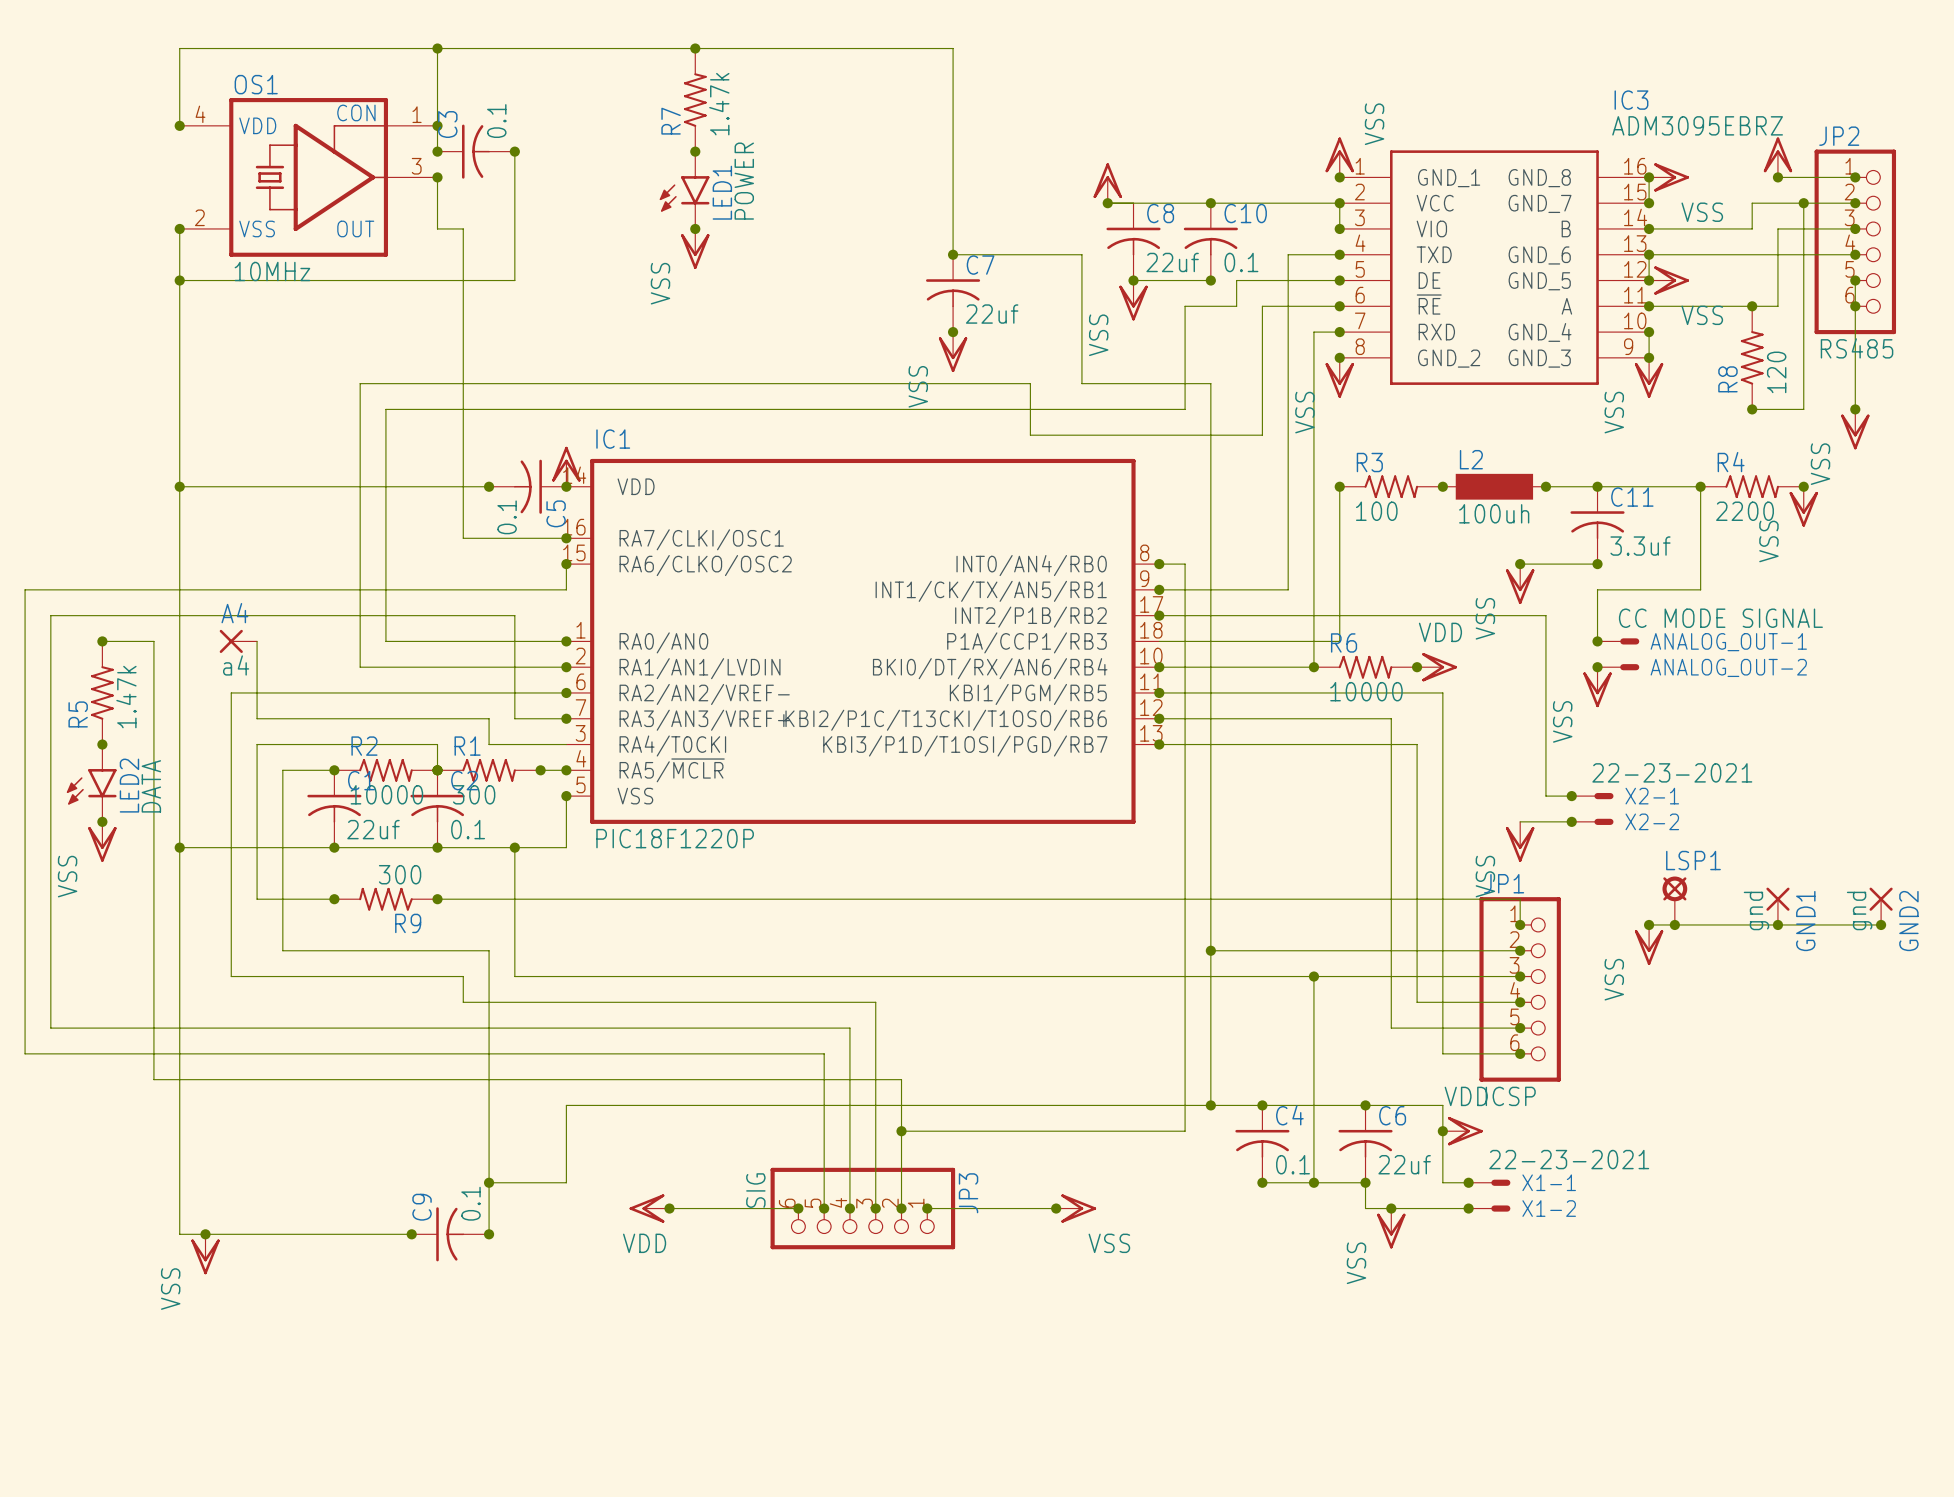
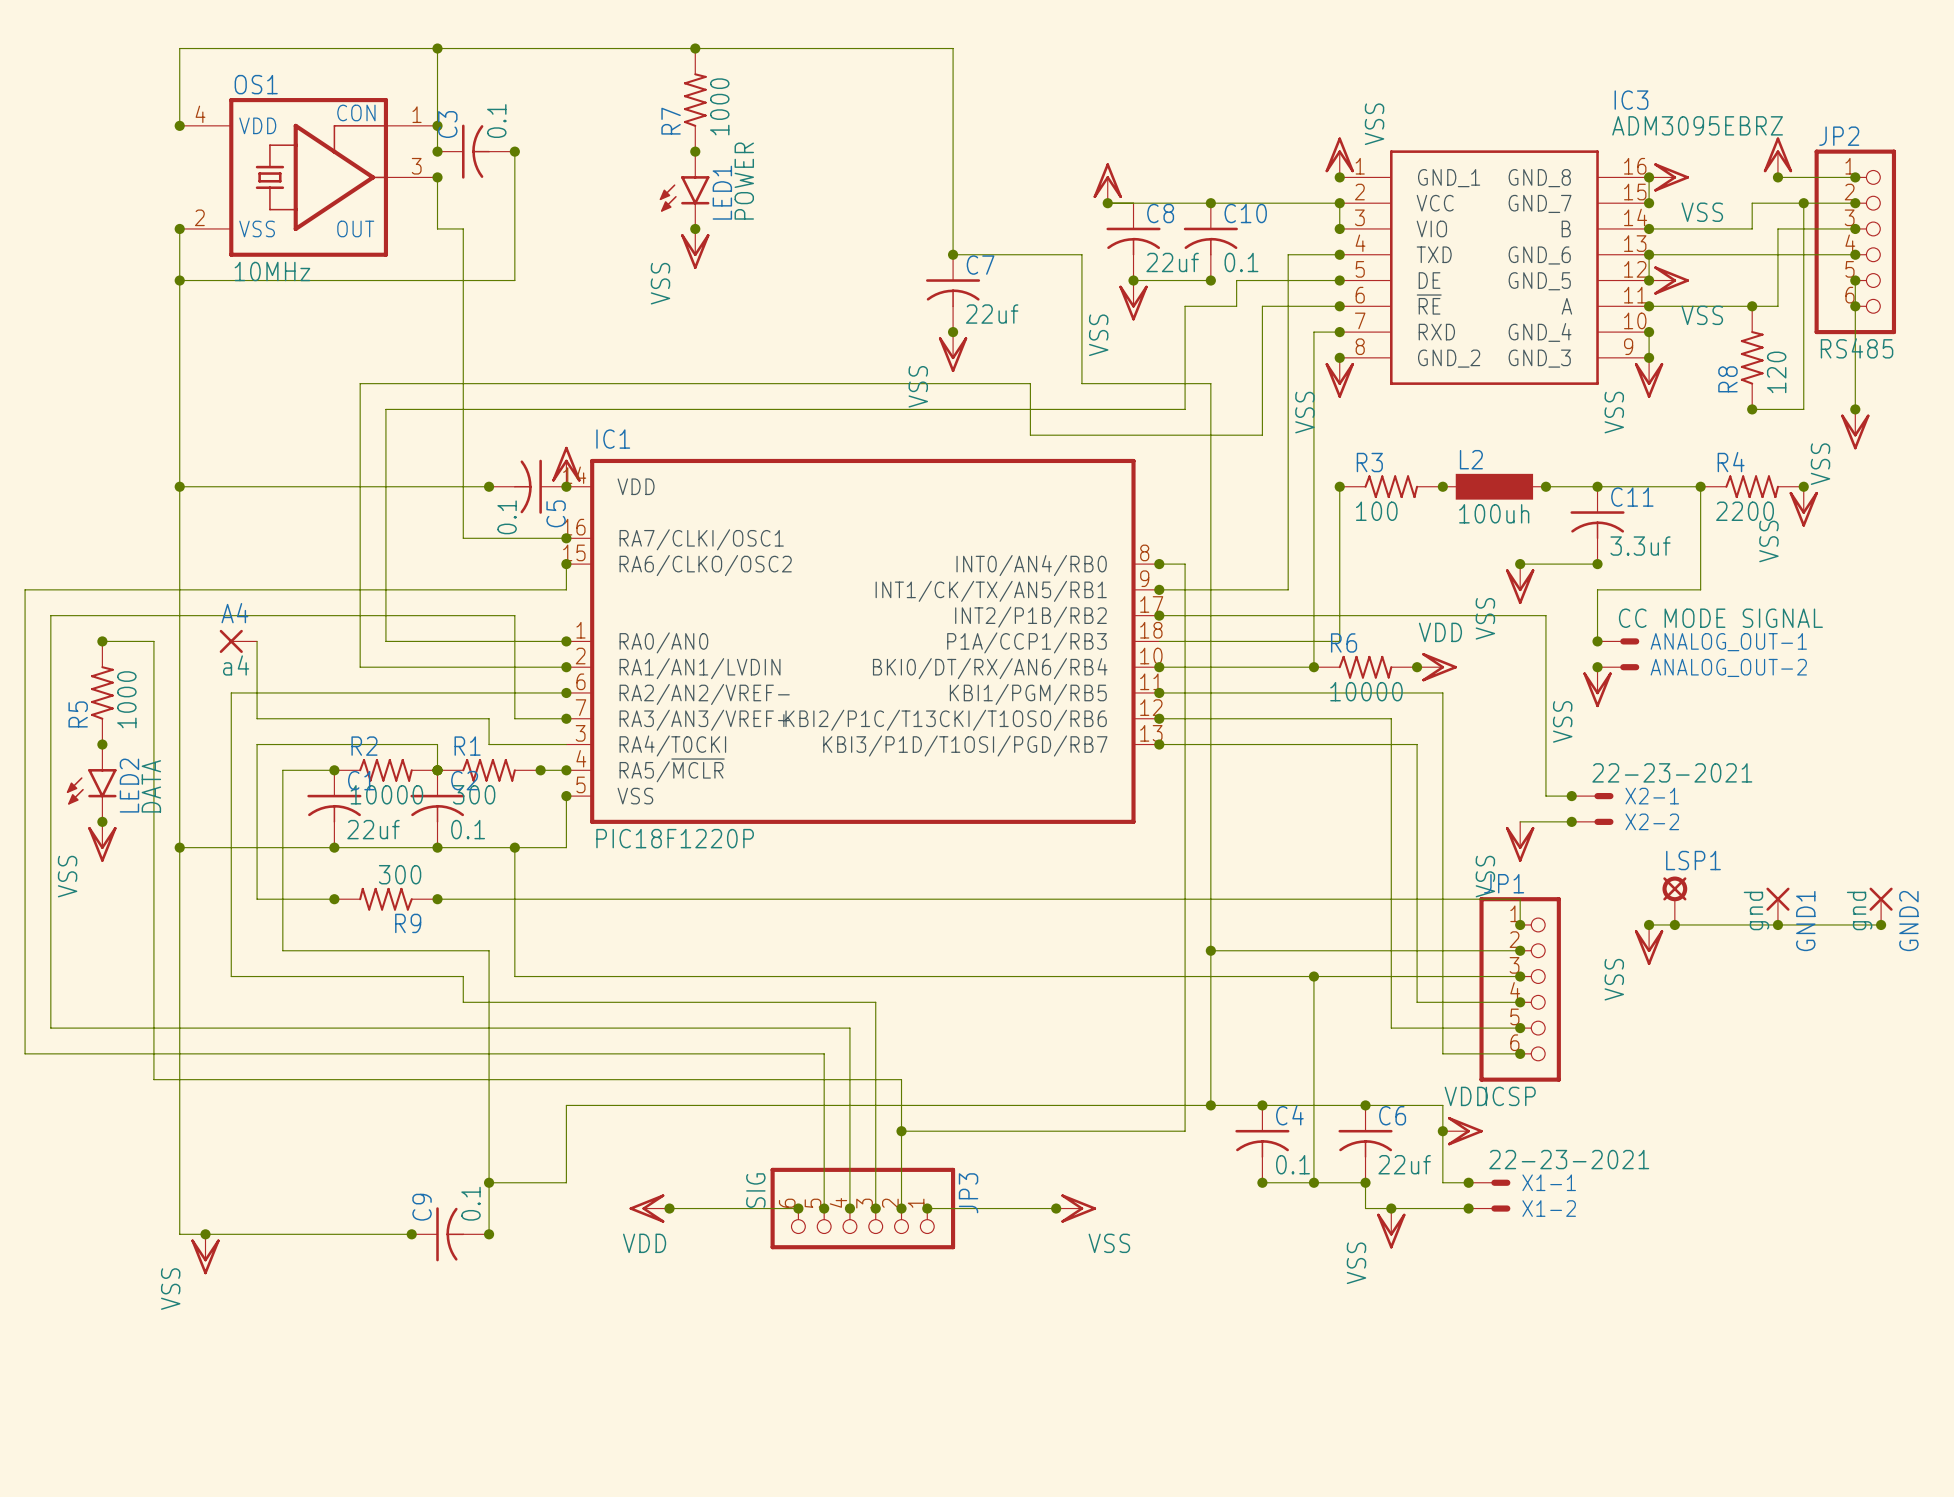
R7 value: 1.47k (719, 104) -> 1000 (719, 106)
R5 value: 1.47k (126, 697) -> 1000 (126, 699)

